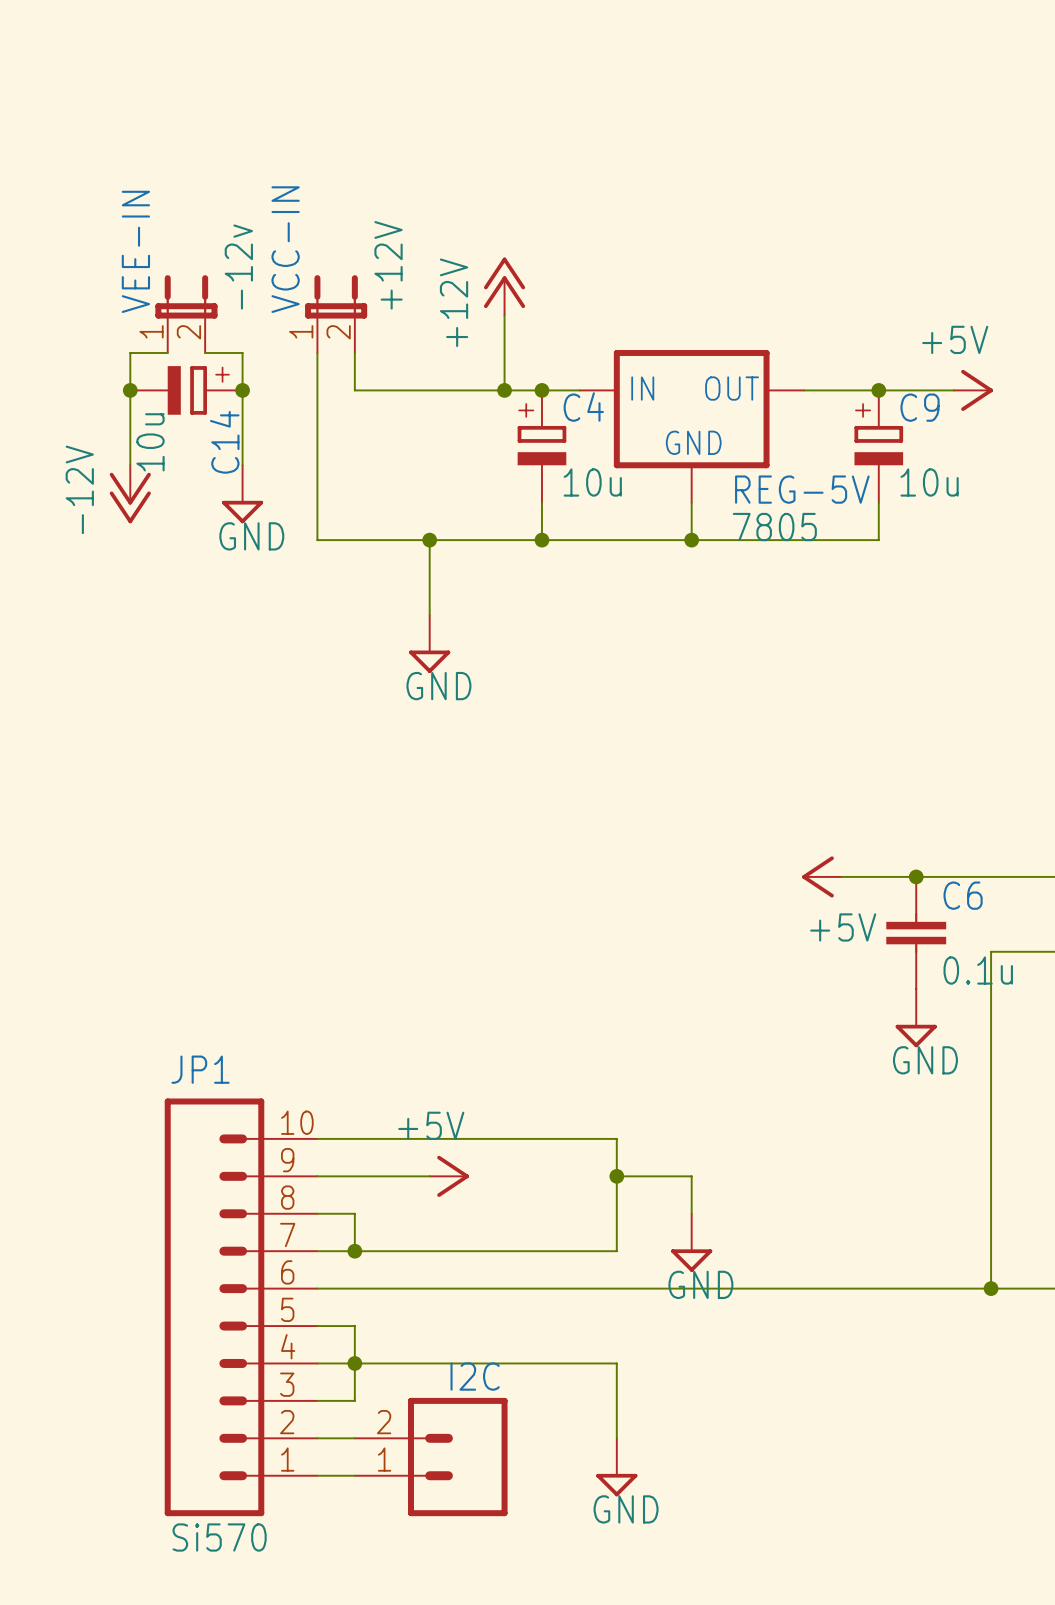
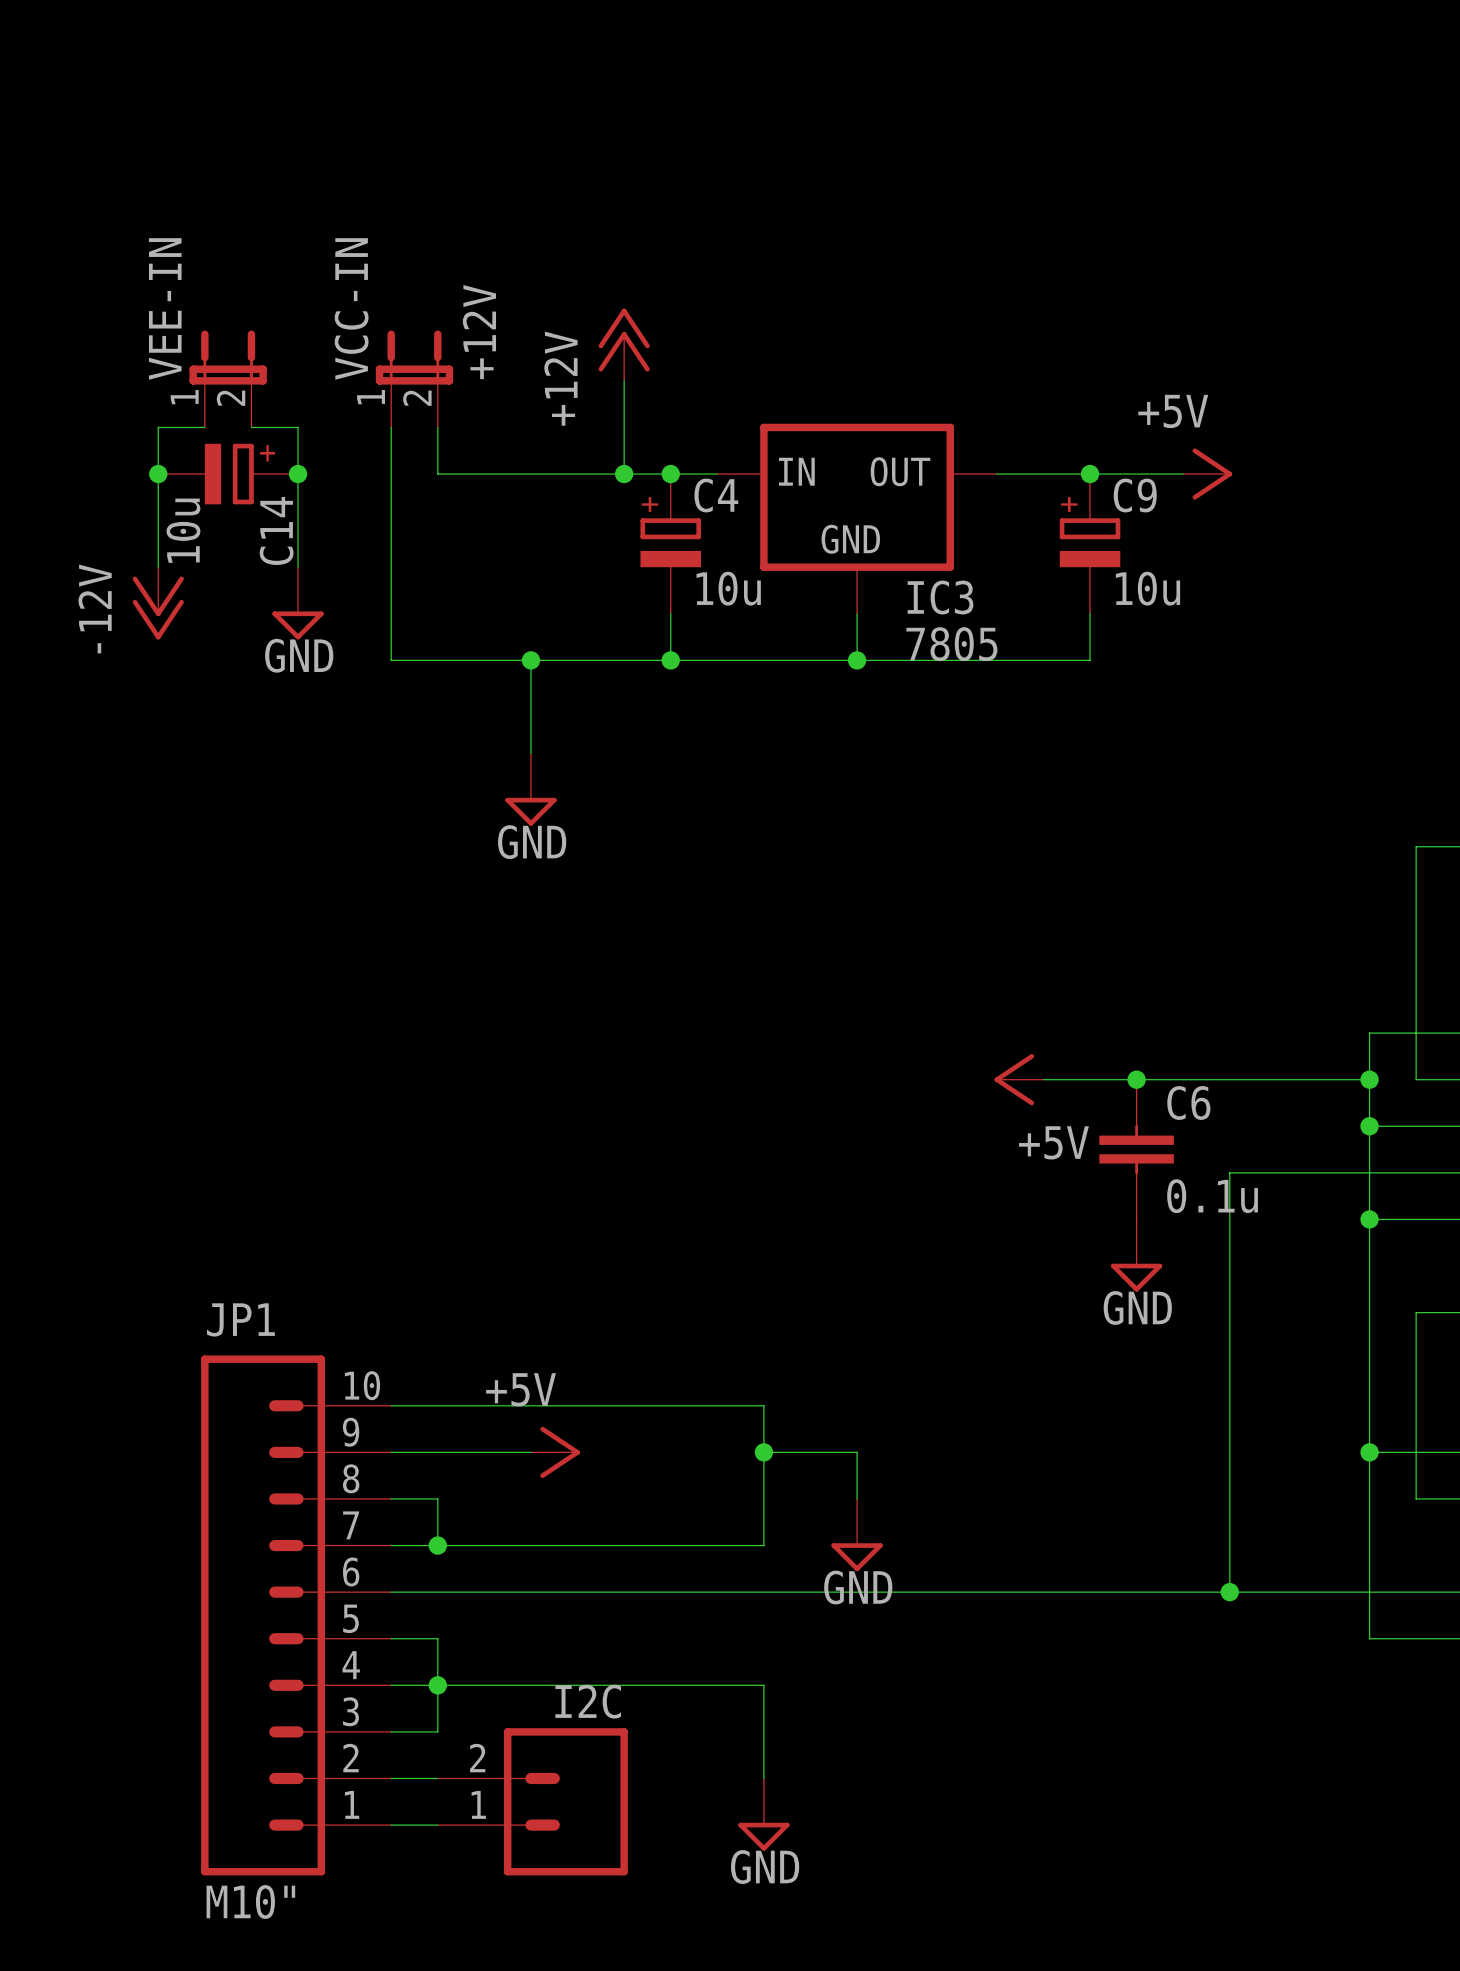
VEE-IN value: -12v (238, 267) -> none
REG-5V name: REG-5V (802, 489) -> IC3 (940, 597)
JP1 value: Si570 (219, 1537) -> M10" (250, 1901)

